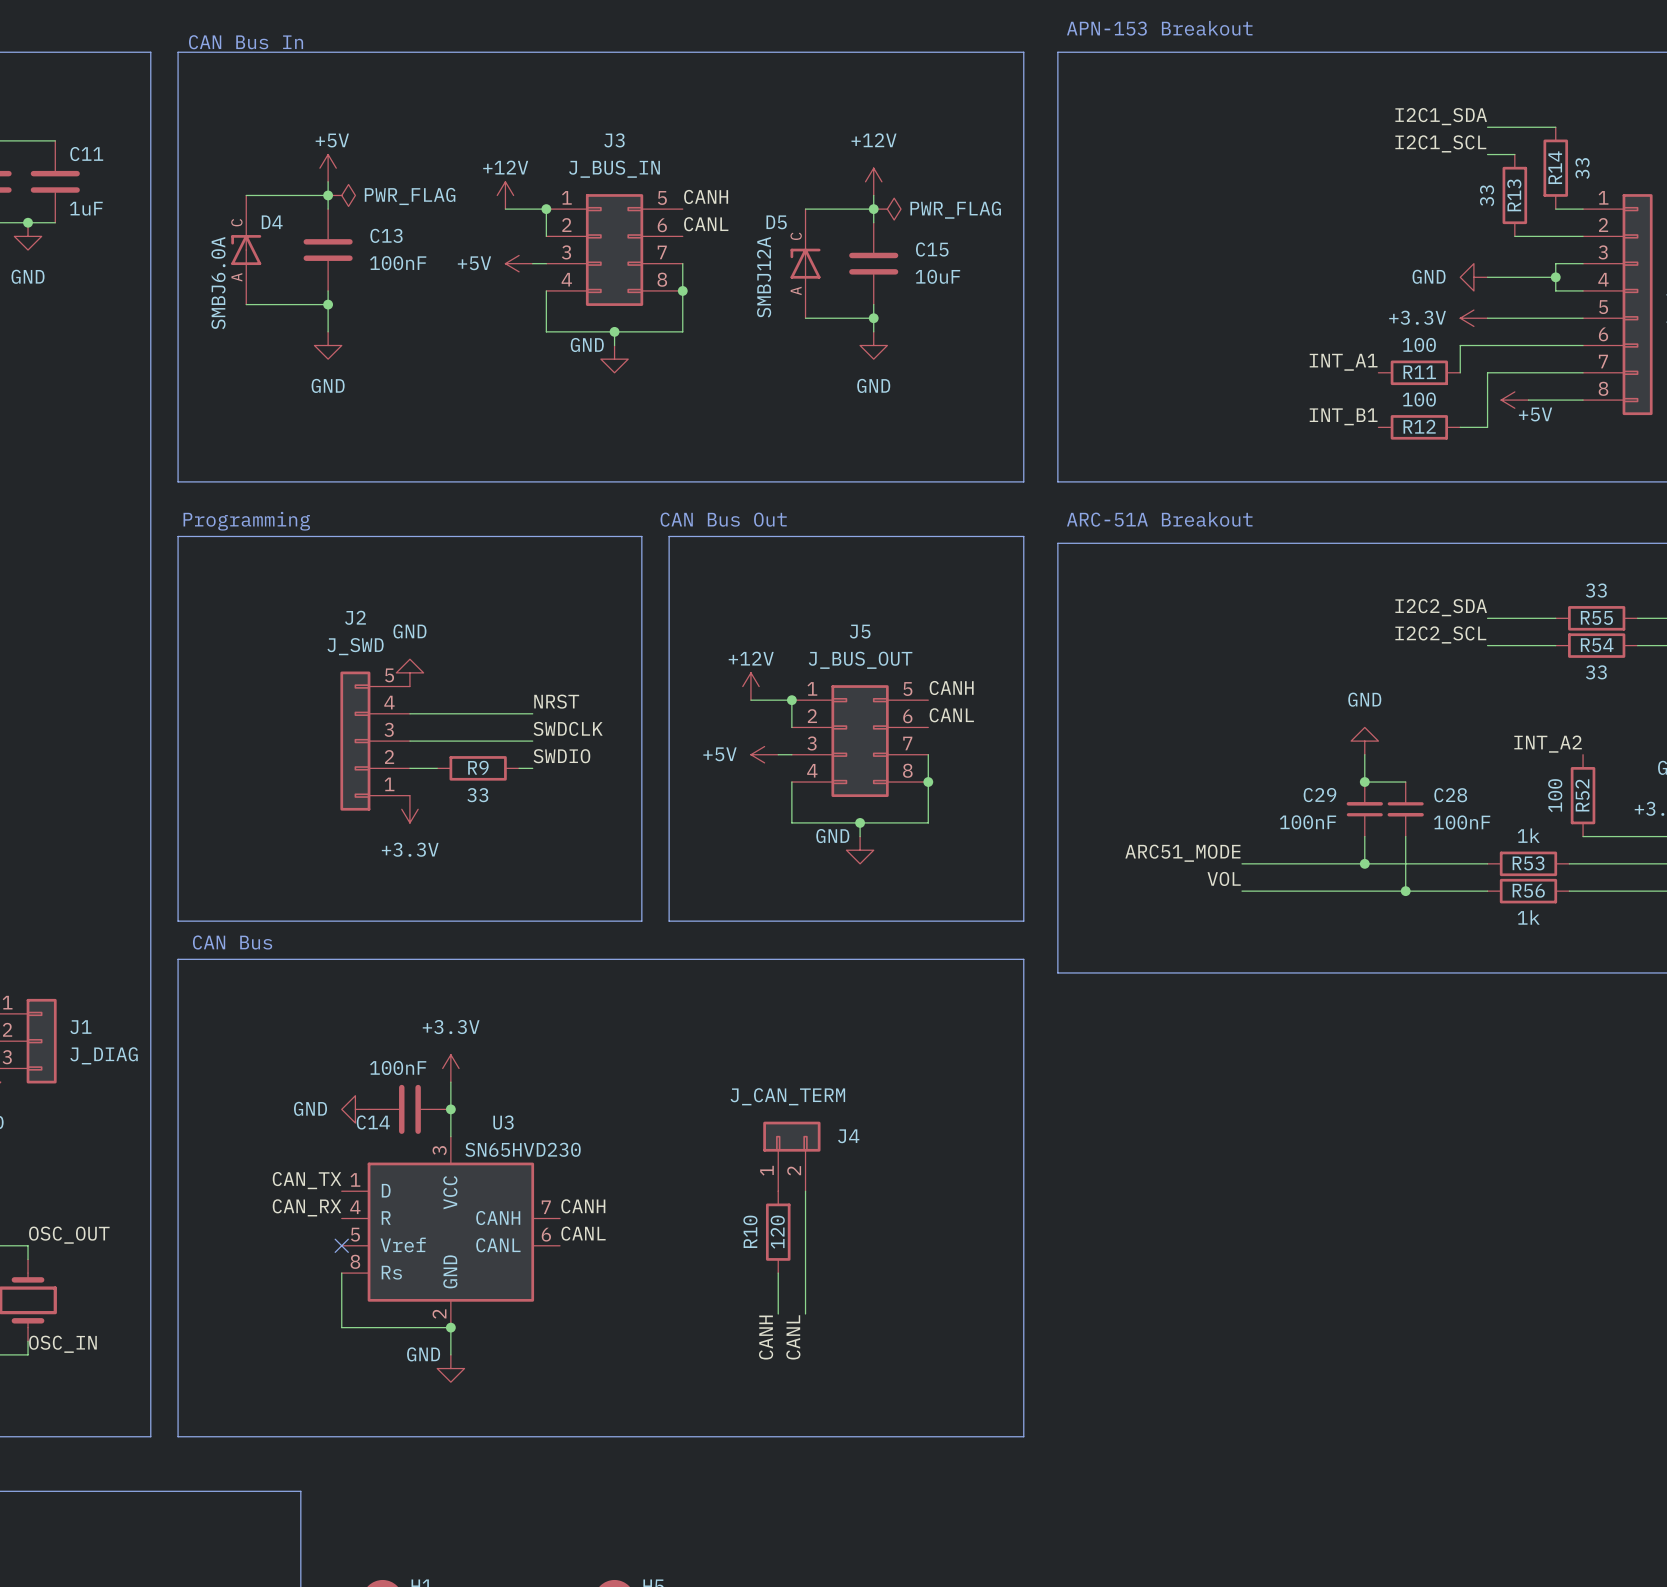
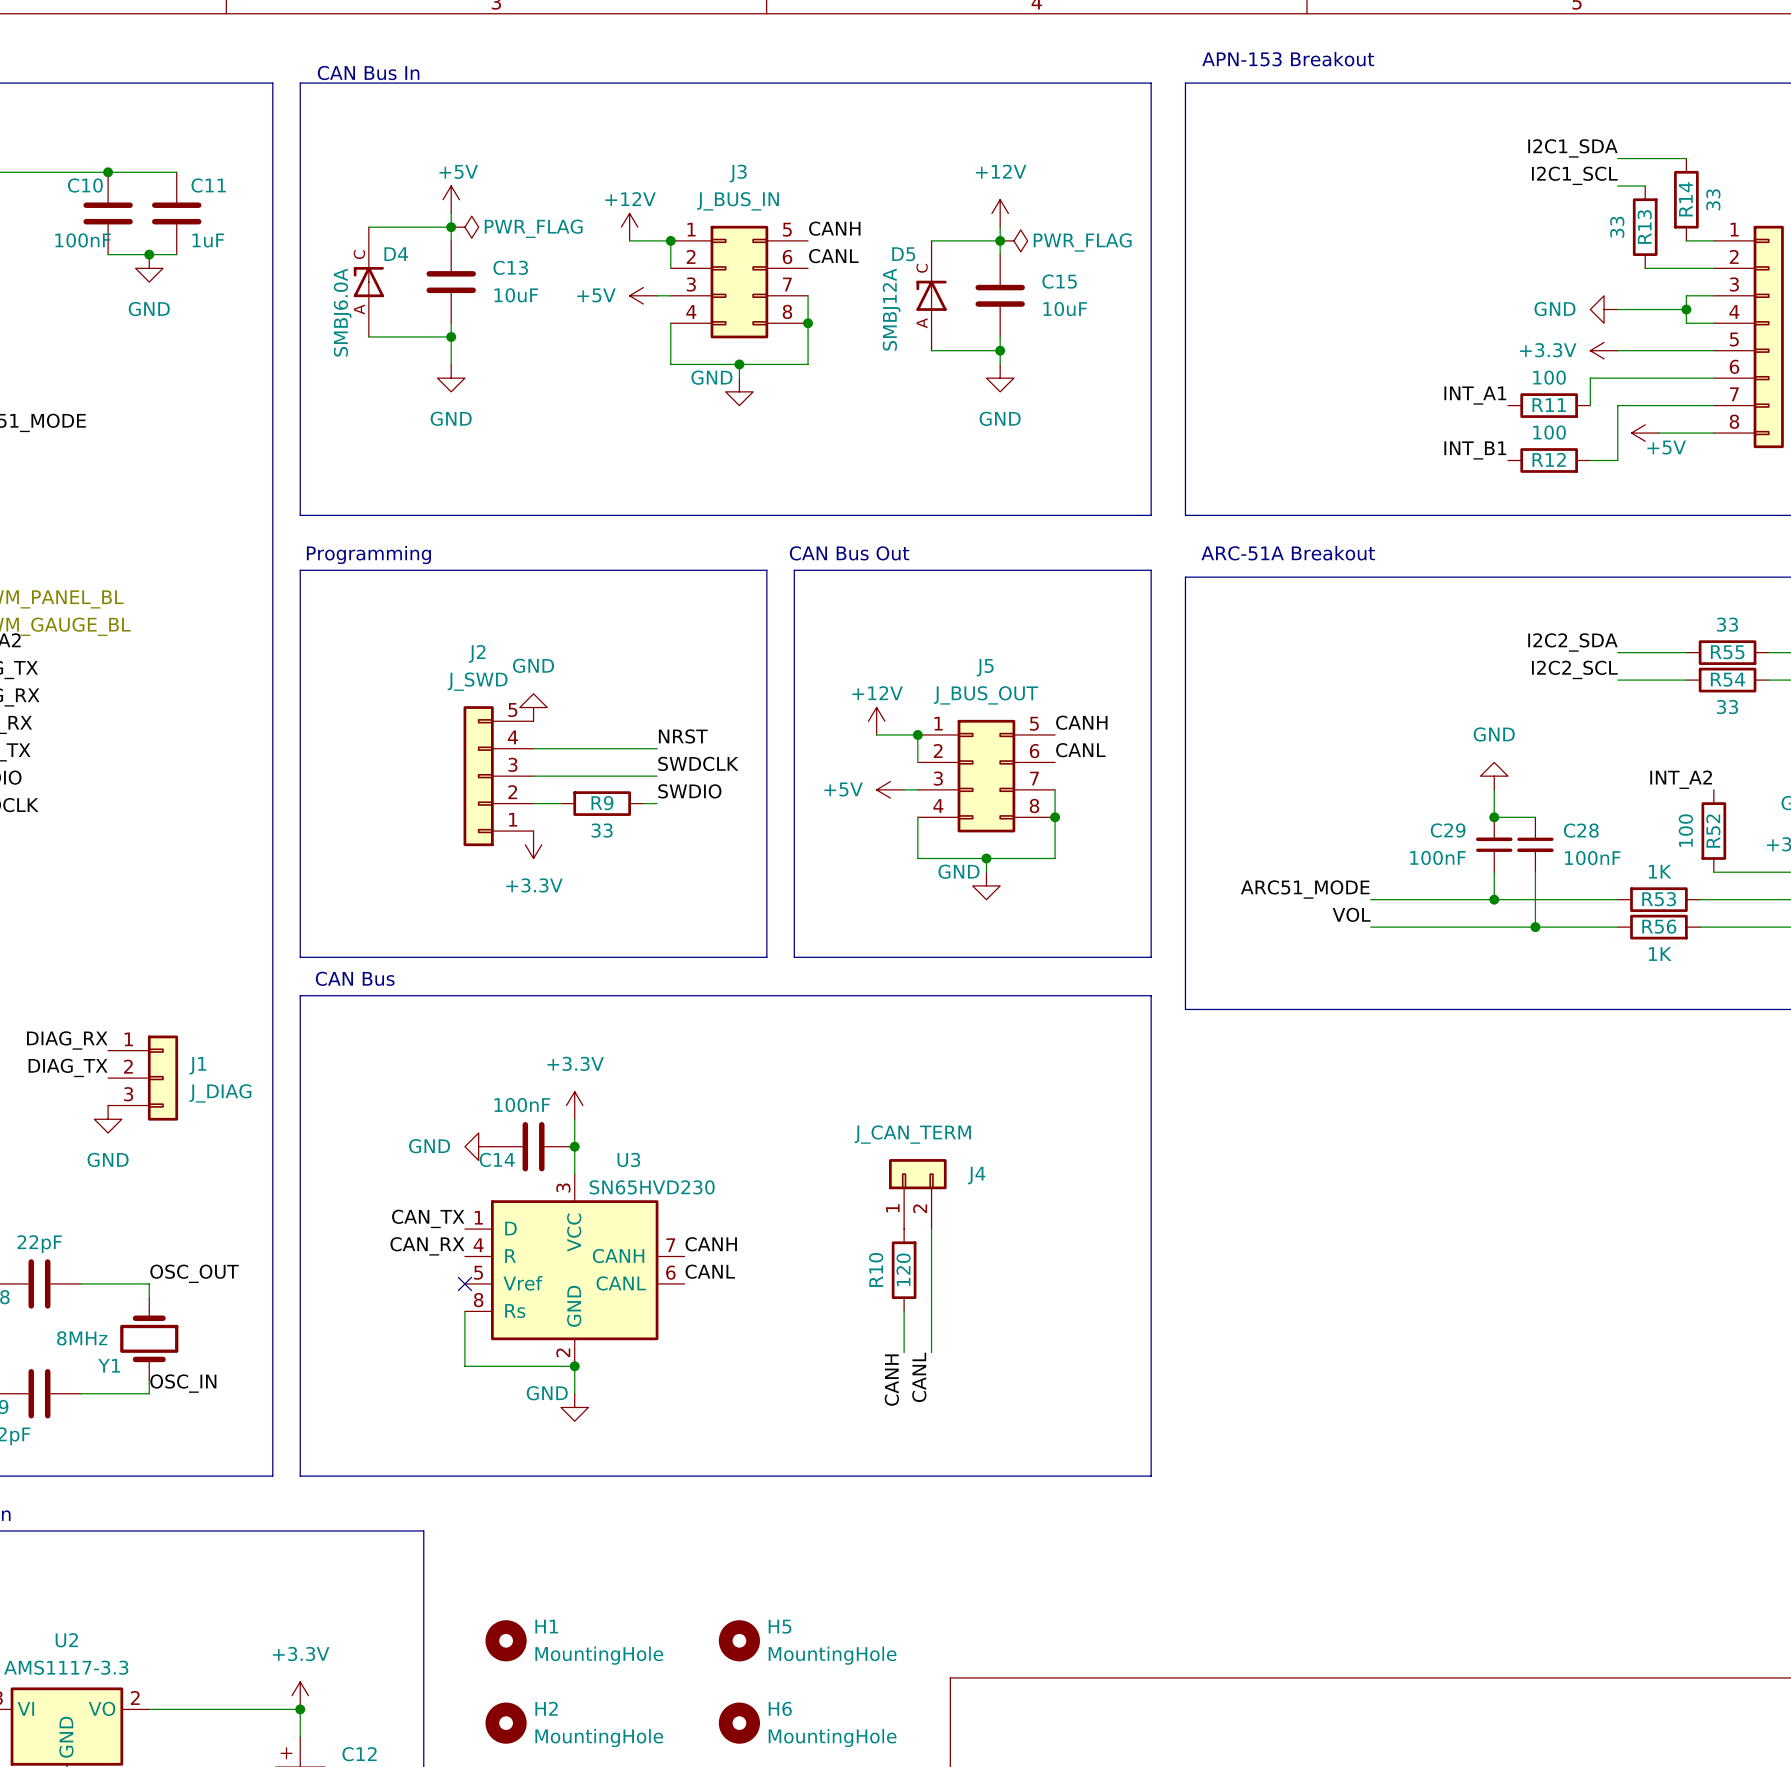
C13 value: 100nF (398, 263) -> 10uF (516, 295)
R53 value: 1k (1528, 835) -> 1K (1660, 871)
R56 value: 1k (1528, 917) -> 1K (1660, 954)

